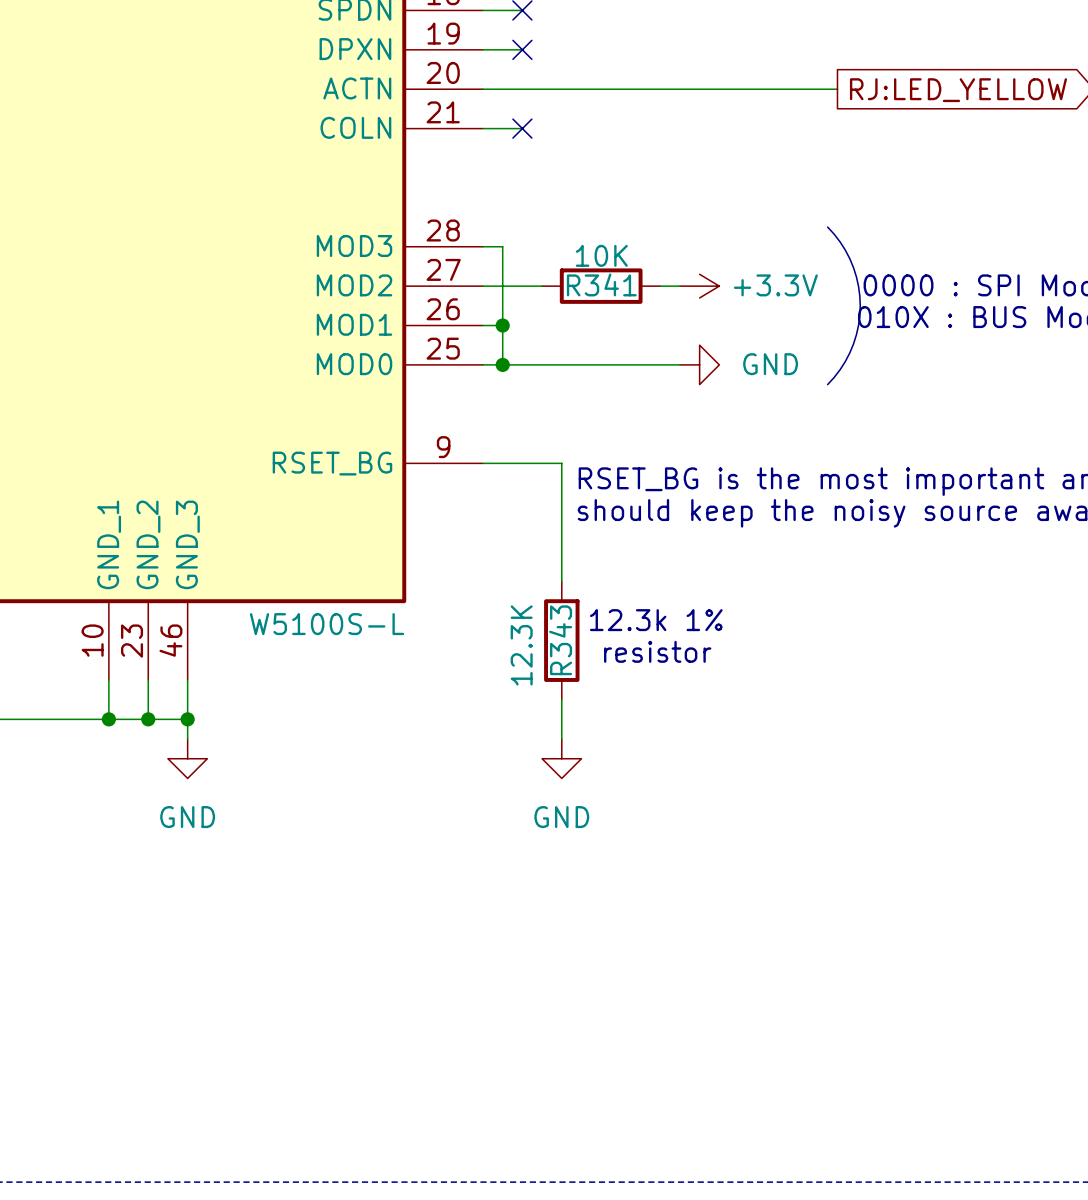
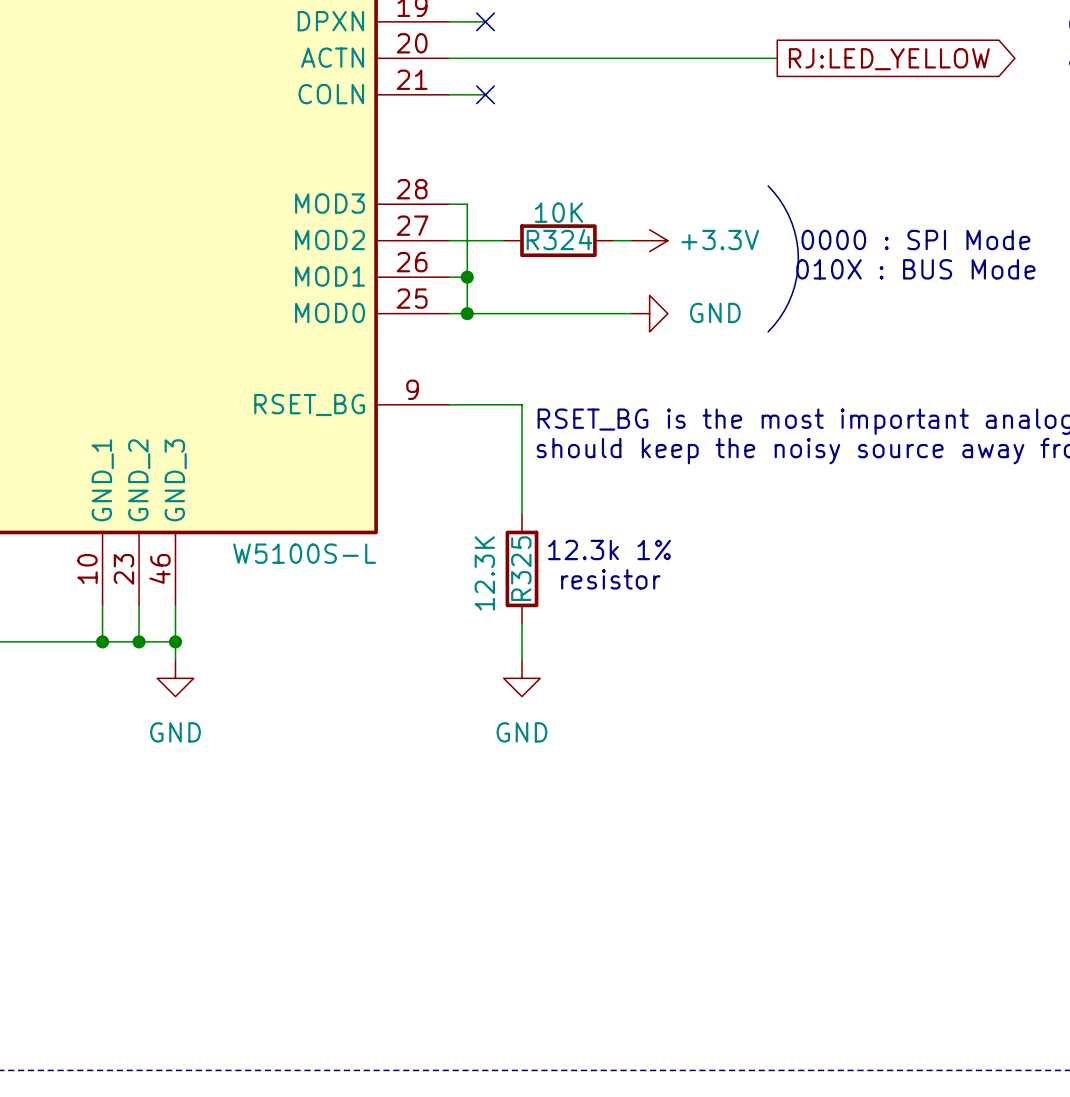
R341 name: R341 (601, 284) -> R324 (559, 239)
R343 name: R343 (560, 640) -> R325 (521, 568)

